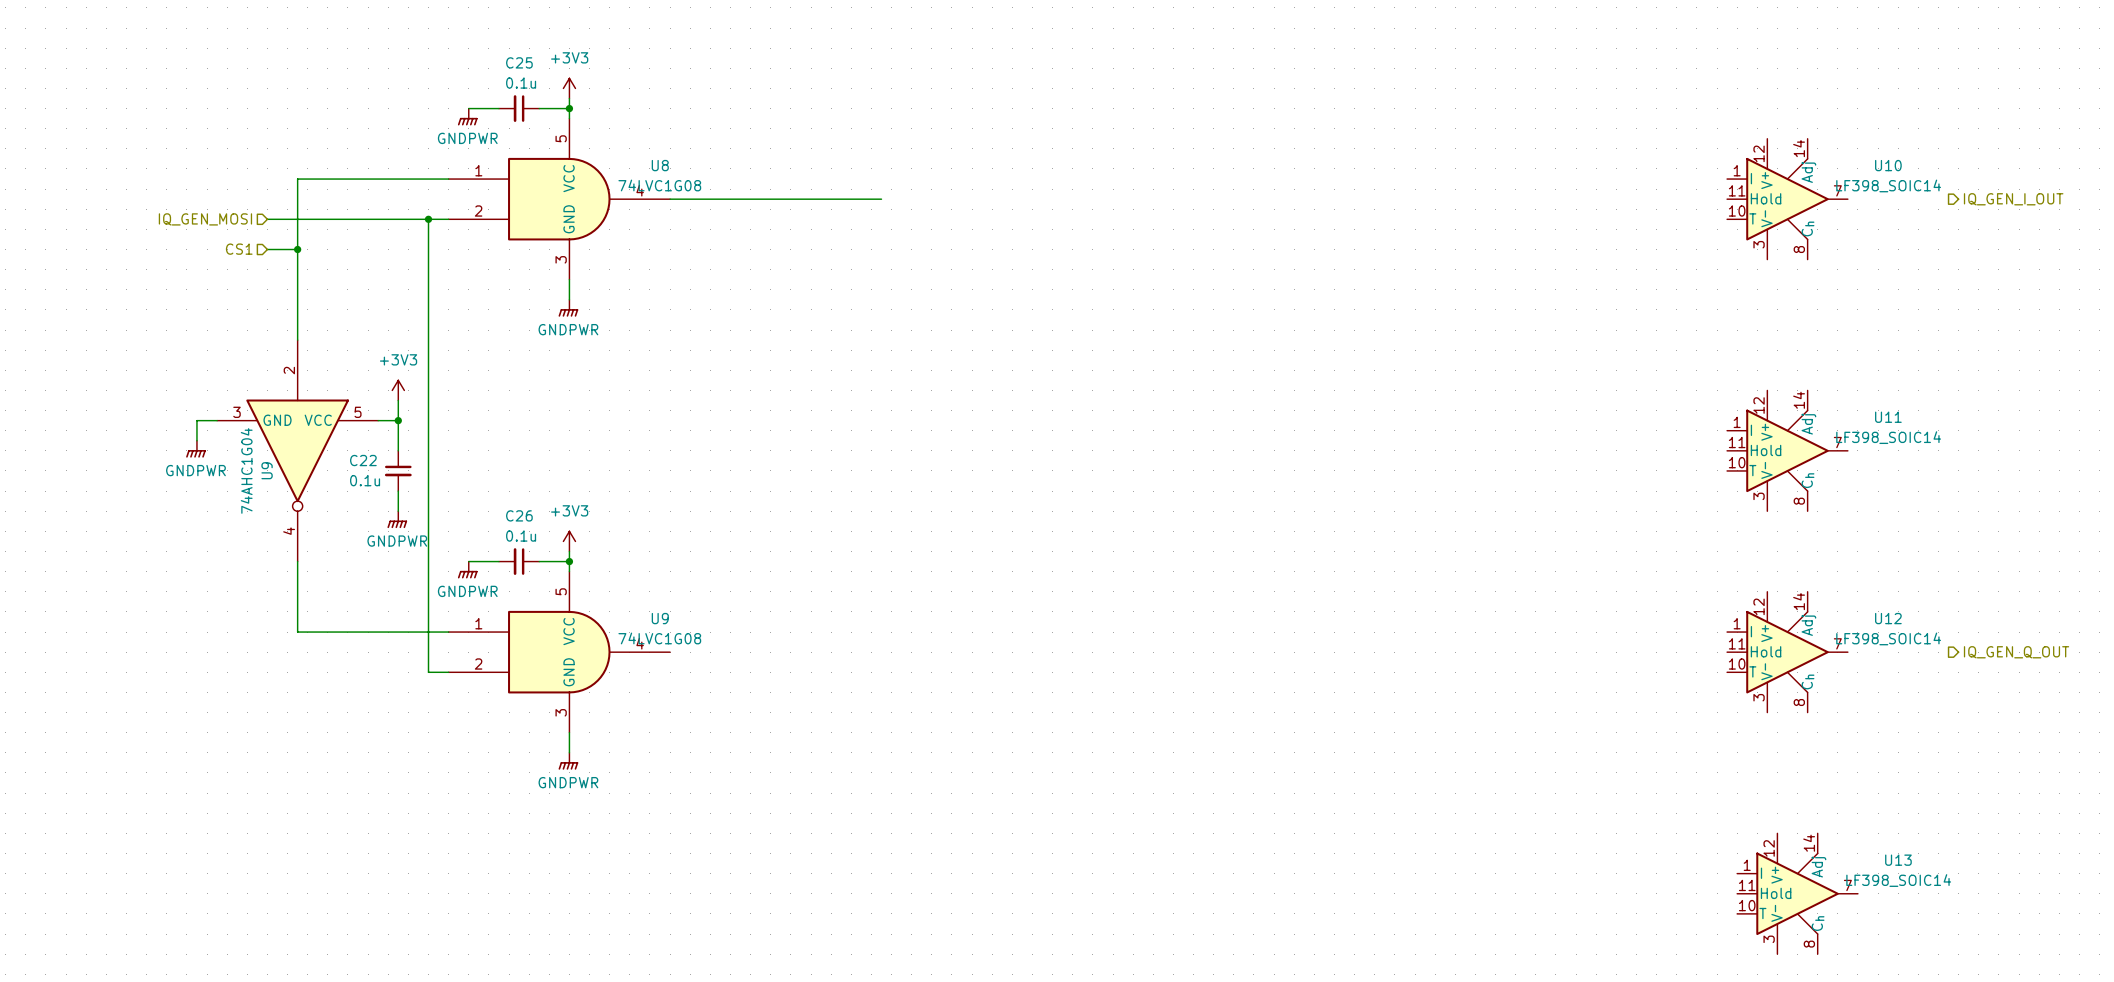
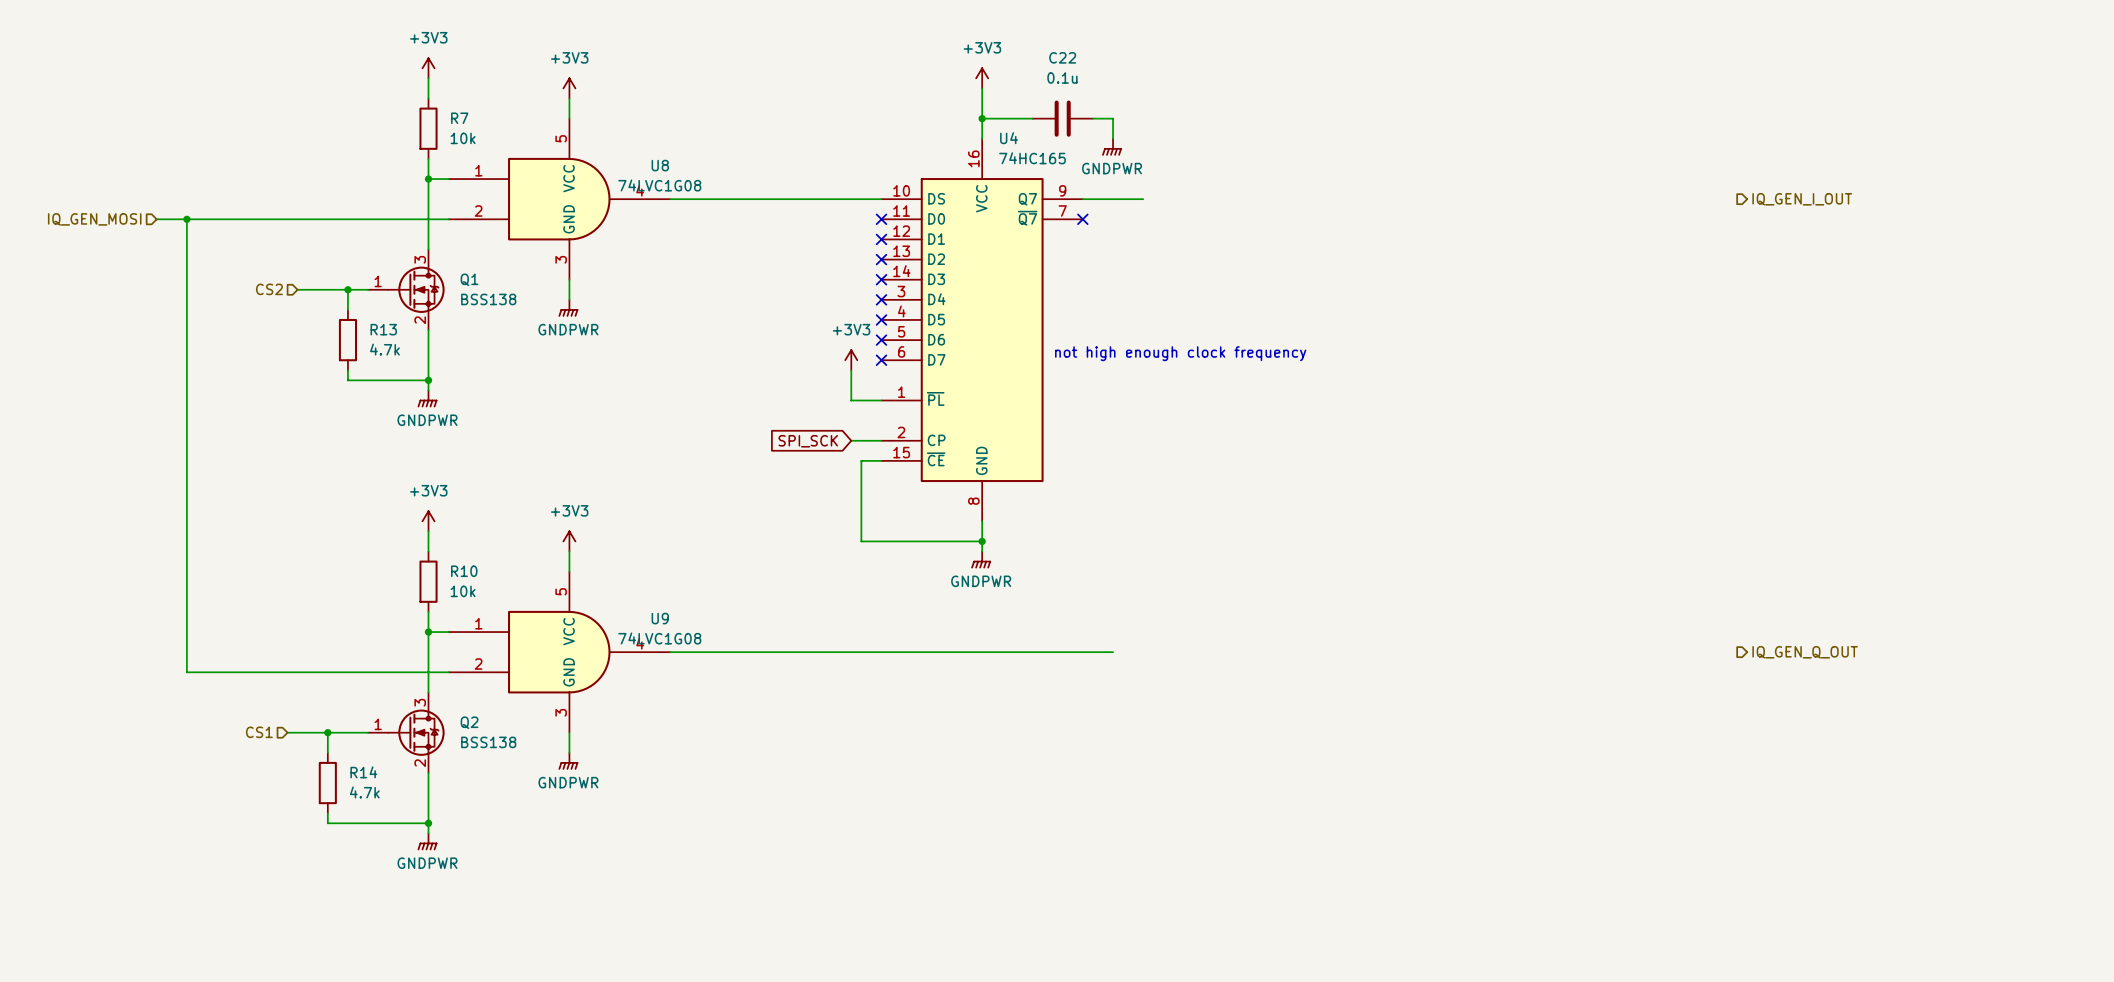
power symbol: none -> +3V3 (428, 68)
wire: none -> (428, 78) (428, 98)
power symbol: none -> +3V3 (982, 78)
wire: none -> (982, 88) (982, 138)
wire: (468, 108) (498, 108) -> none
C25: 0.1u (519, 108) -> none
wire: (539, 108) (569, 108) -> none
junction: (569, 108) -> none
power symbol: GNDPWR (467, 117) -> none
wire: none -> (982, 118) (1032, 118)
junction: none -> (982, 118)
wire: none -> (1092, 118) (1113, 118) (1113, 138)
R7: none -> 10k (428, 128)
power symbol: none -> GNDPWR (1112, 147)
wire: none -> (428, 158) (428, 219)
wire: (428, 179) (297, 179) (297, 340) -> none
wire: none -> (1082, 199) (1143, 199)
U10: LF398_SOIC14 (1787, 199) -> none
hierarchical label: none -> IQ_GEN_I_OUT (1802, 199)
hierarchical label: IQ_GEN_I_OUT (2013, 199) -> none
wire: none -> (156, 219) (267, 219)
wire: none -> (186, 219) (186, 672) (428, 672) (428, 692)
junction: none -> (186, 219)
hierarchical label position: IQ_GEN_MOSI (205, 219) -> IQ_GEN_MOSI (94, 219)
junction position: (428, 219) -> (428, 179)
no-connect mark: none -> (881, 219)
no-connect mark: none -> (1082, 219)
no-connect mark: none -> (881, 239)
hierarchical label: CS1 (239, 249) -> none
wire: (267, 249) (297, 249) -> none
junction: (297, 249) -> none
no-connect mark: none -> (881, 259)
no-connect mark: none -> (881, 279)
hierarchical label: none -> CS2 (269, 289)
wire: none -> (297, 289) (368, 289)
wire: none -> (347, 289) (347, 309)
junction: none -> (347, 289)
Q1: none -> BSS138 (406, 289)
no-connect mark: none -> (881, 299)
no-connect mark: none -> (881, 319)
U4: none -> 74HC165 (982, 330)
R13: none -> 4.7k (347, 340)
no-connect mark: none -> (881, 340)
text: none -> not high enough clock frequency (1180, 353)
power symbol: none -> +3V3 (851, 360)
no-connect mark: none -> (881, 360)
wire: none -> (347, 370) (347, 380) (428, 380)
wire: none -> (851, 370) (851, 400) (881, 400)
junction: none -> (428, 380)
power symbol position: +3V3 (398, 390) -> +3V3 (428, 521)
wire: (428, 390) (428, 531) -> none
power symbol: none -> GNDPWR (427, 398)
wire: (398, 400) (398, 450) -> none
wire: (217, 420) (196, 420) (196, 440) -> none
wire: (378, 420) (398, 420) -> none
junction: (398, 420) -> none
wire: none -> (851, 440) (881, 440)
global label: none -> SPI_SCK (808, 441)
power symbol: GNDPWR (195, 449) -> none
U9: 74AHC1G04 (297, 450) -> none
C22 symbol: [384, 450, 412, 492] -> [1032, 100, 1093, 137]
U11: LF398_SOIC14 (1787, 450) -> none
C22 name position: C22 (363, 460) -> C22 (1062, 57)
wire: none -> (881, 460) (861, 460) (861, 541) (982, 541)
C22 value position: 0.1u (365, 480) -> 0.1u (1062, 78)
wire: (398, 491) (398, 511) -> none
power symbol: GNDPWR (397, 519) -> none
wire: none -> (982, 521) (982, 551)
junction: none -> (982, 541)
wire: (428, 551) (428, 611) -> none
power symbol: none -> GNDPWR (981, 559)
wire: (297, 561) (297, 632) (428, 632) -> none
wire: (468, 561) (498, 561) -> none
C26: 0.1u (519, 561) -> none
wire: (539, 561) (569, 561) -> none
junction: (569, 561) -> none
power symbol: GNDPWR (467, 570) -> none
R10: none -> 10k (428, 581)
junction: none -> (428, 632)
wire: none -> (670, 652) (1113, 652)
U12: LF398_SOIC14 (1787, 652) -> none
hierarchical label: none -> IQ_GEN_Q_OUT (1805, 652)
hierarchical label: IQ_GEN_Q_OUT (2016, 652) -> none
hierarchical label: none -> CS1 (259, 732)
wire: none -> (287, 732) (368, 732)
wire: none -> (327, 732) (327, 752)
junction: none -> (327, 732)
Q2: none -> BSS138 (406, 732)
wire: none -> (428, 772) (428, 833)
R14: none -> 4.7k (327, 783)
wire: none -> (327, 813) (327, 823) (428, 823)
junction: none -> (428, 823)
power symbol: none -> GNDPWR (427, 841)
U13: LF398_SOIC14 (1797, 893) -> none

